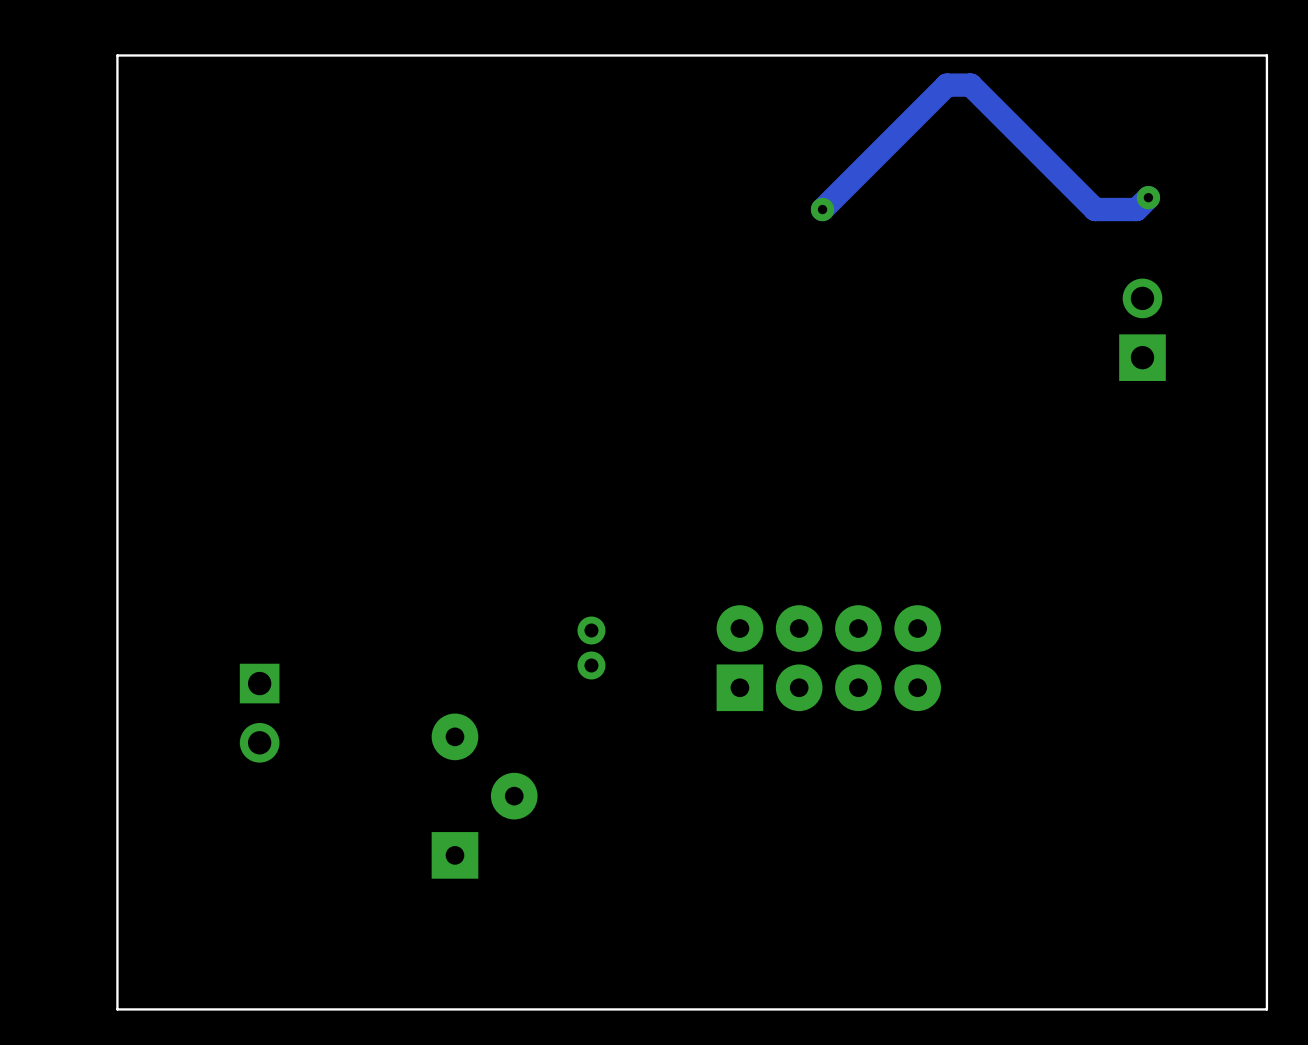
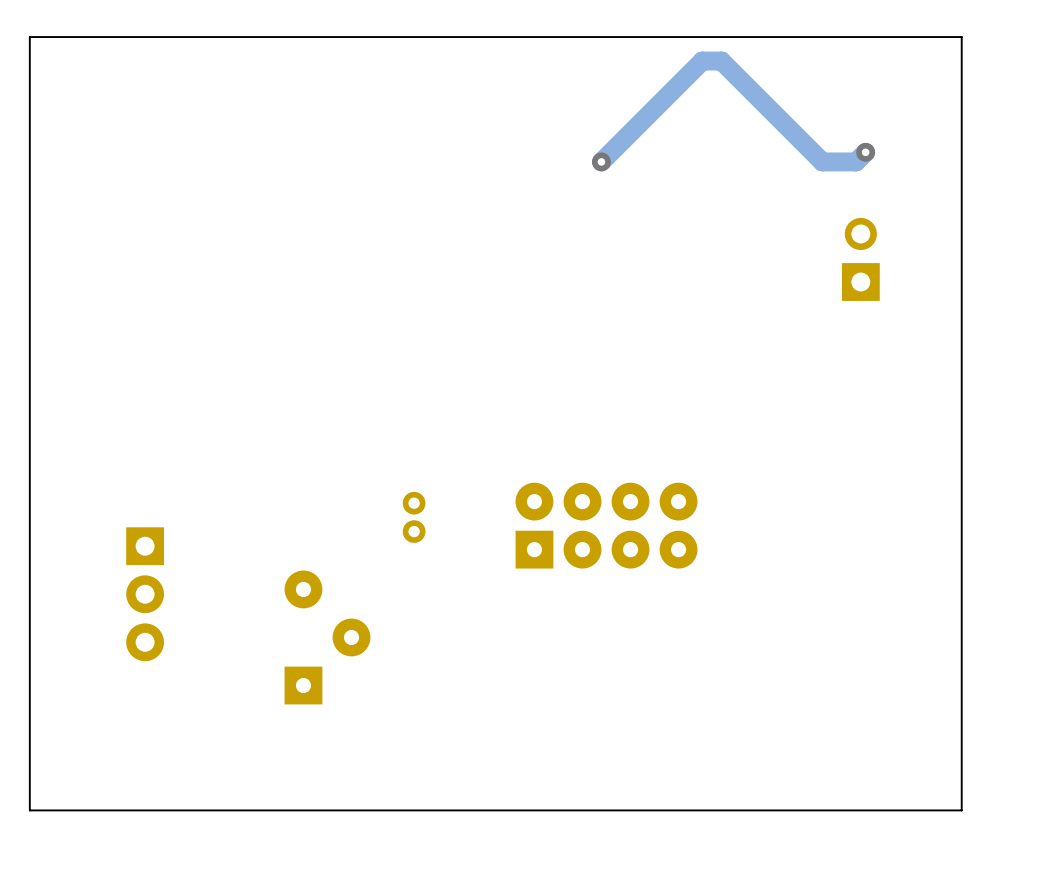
part: (259, 713) -> none
part: none -> (145, 594)

